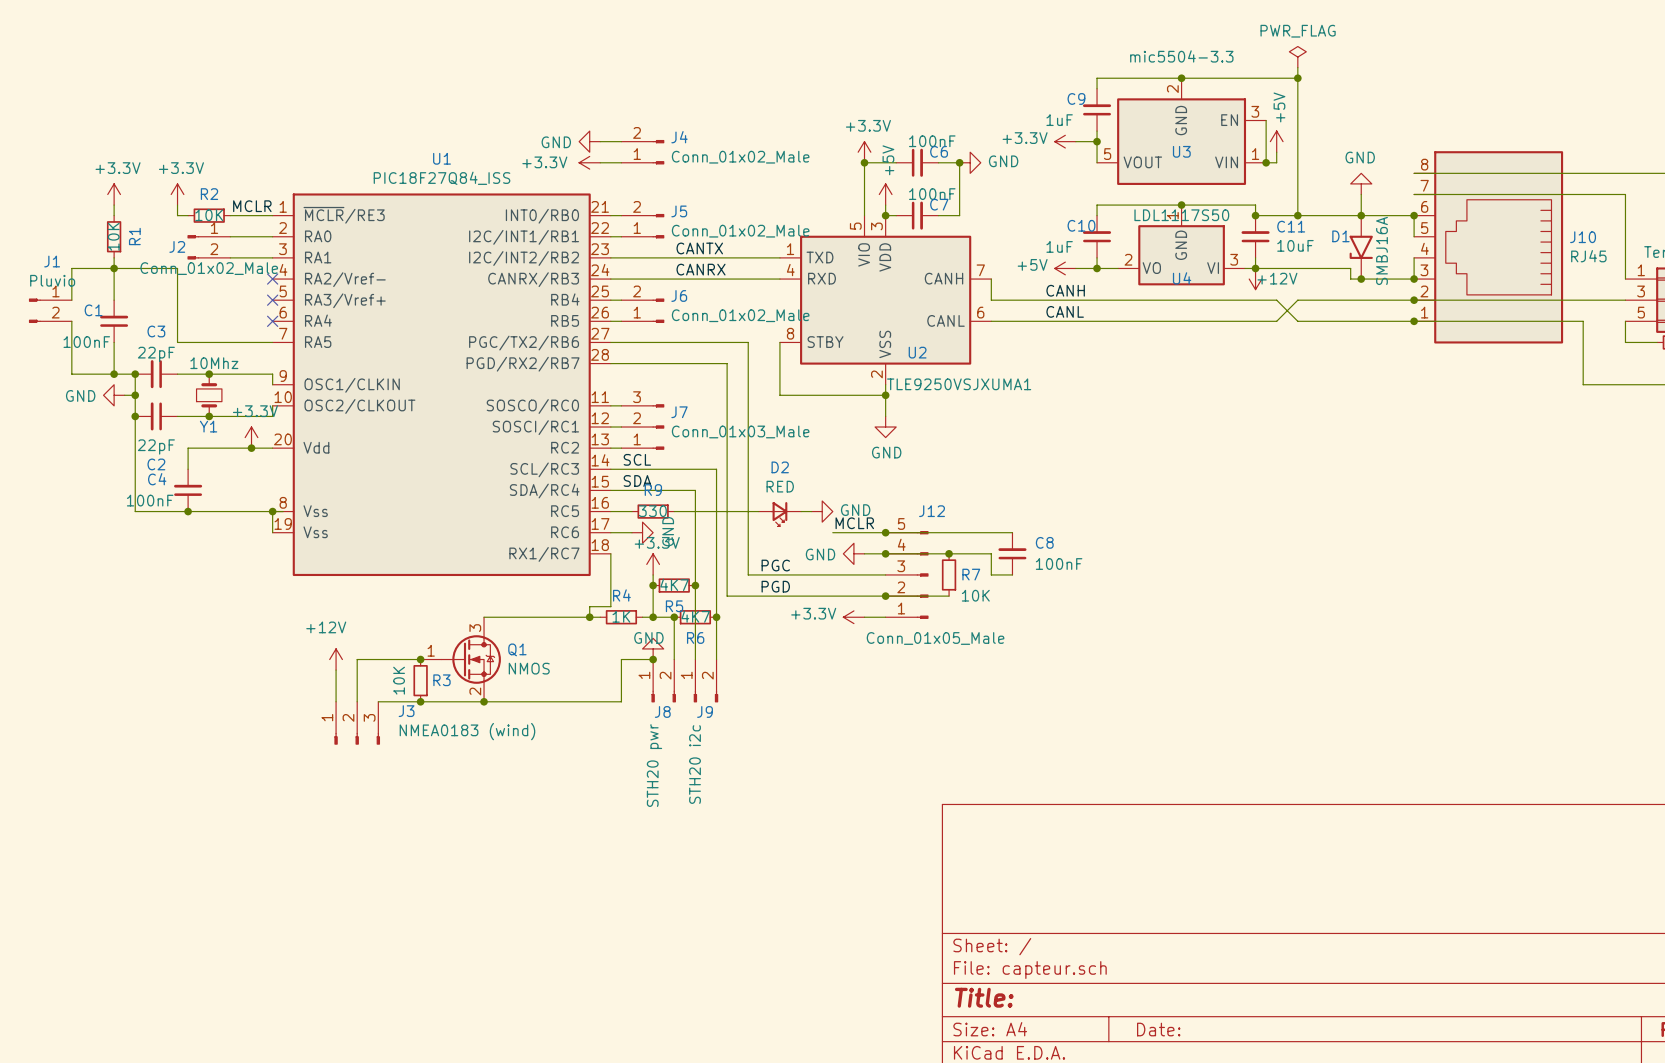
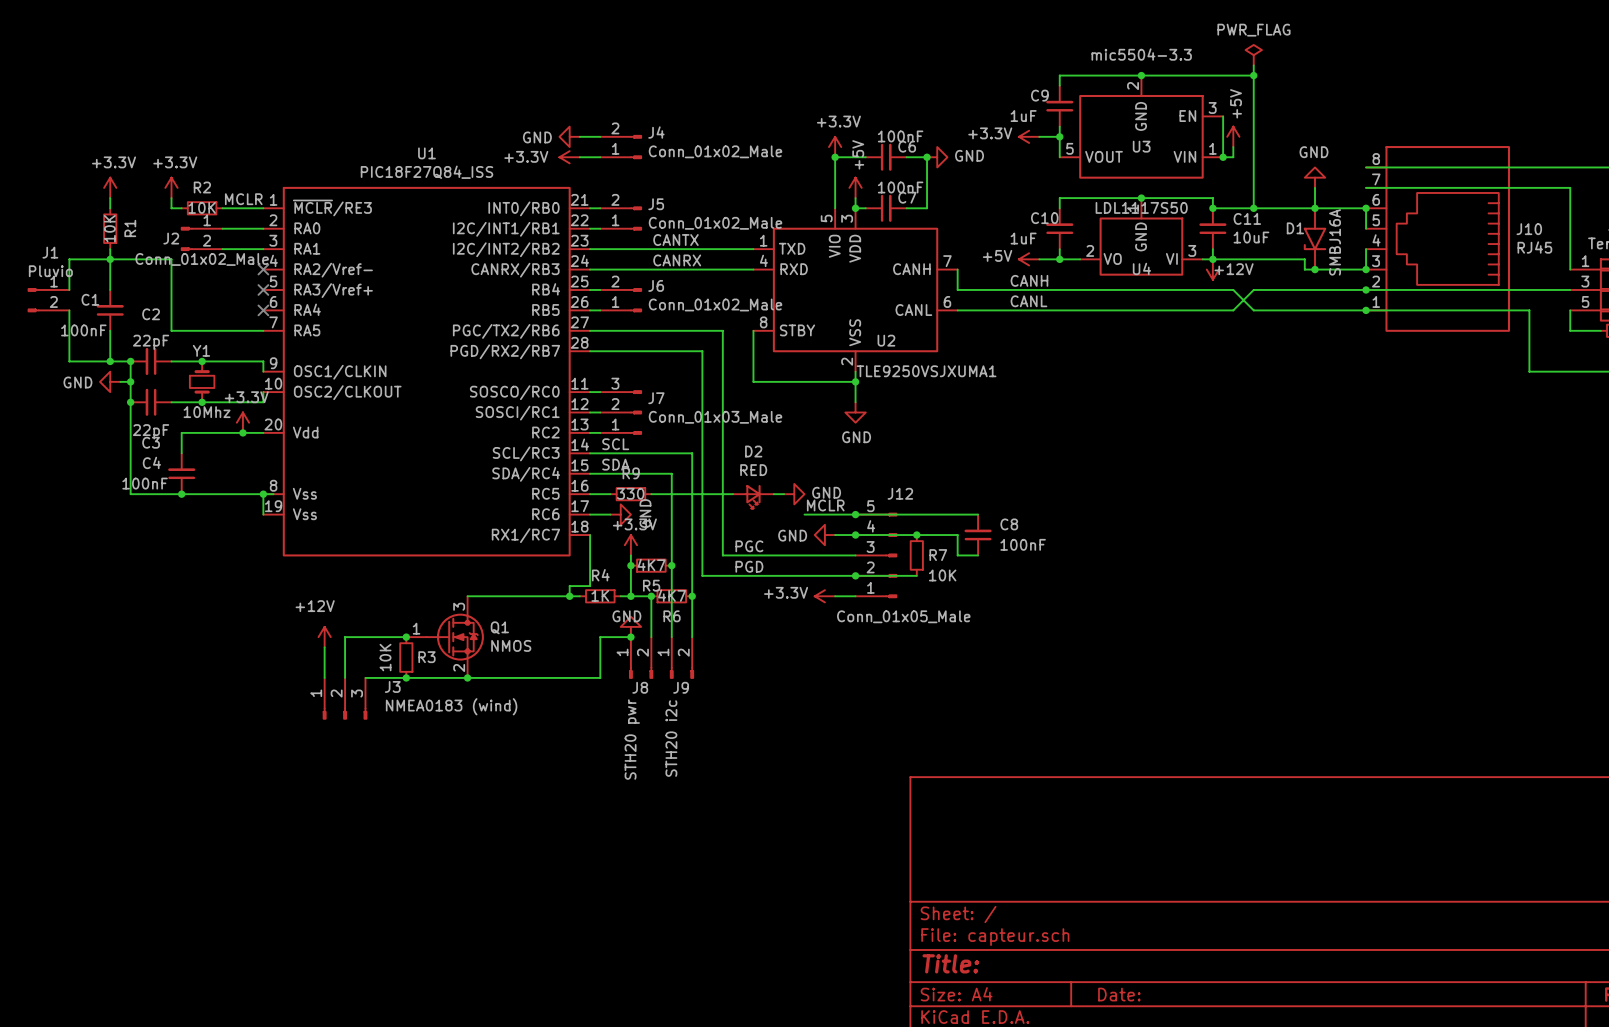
C3 name: C3 (156, 331) -> C2 (151, 314)
Y1 value position: 10Mhz (214, 363) -> 10Mhz (207, 412)
Y1 name position: Y1 (208, 426) -> Y1 (201, 350)
C2 name: C2 (156, 464) -> C3 (151, 442)

